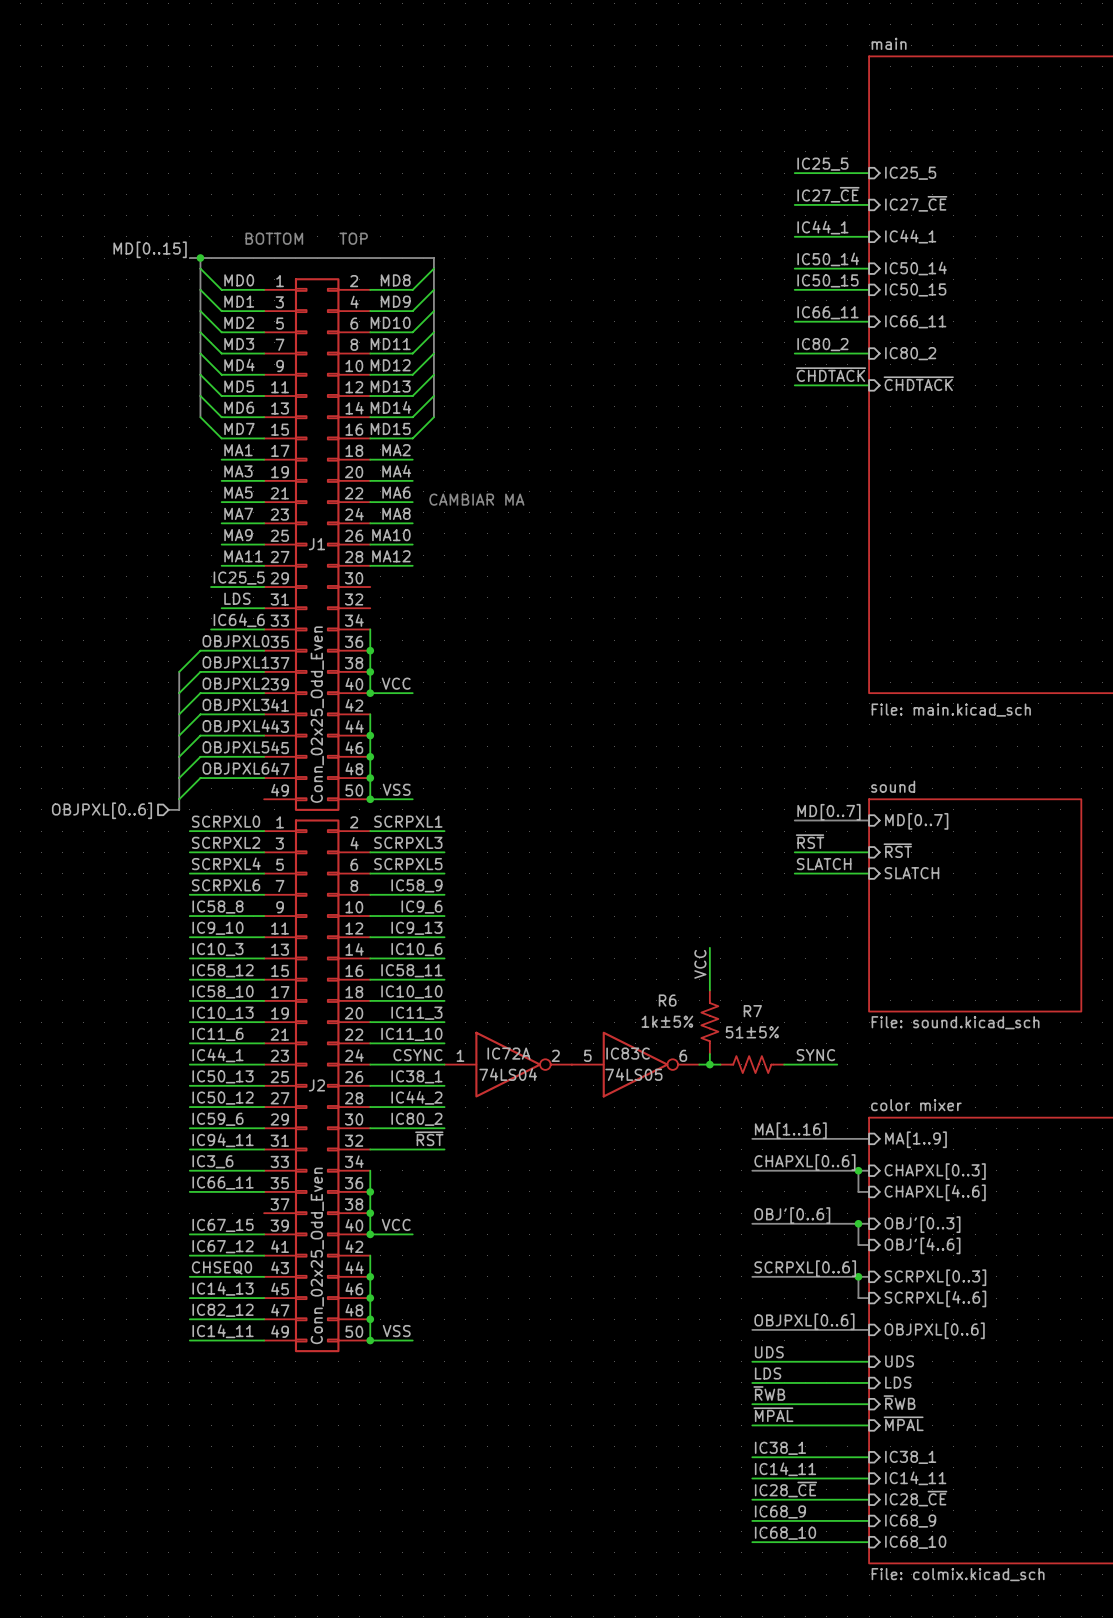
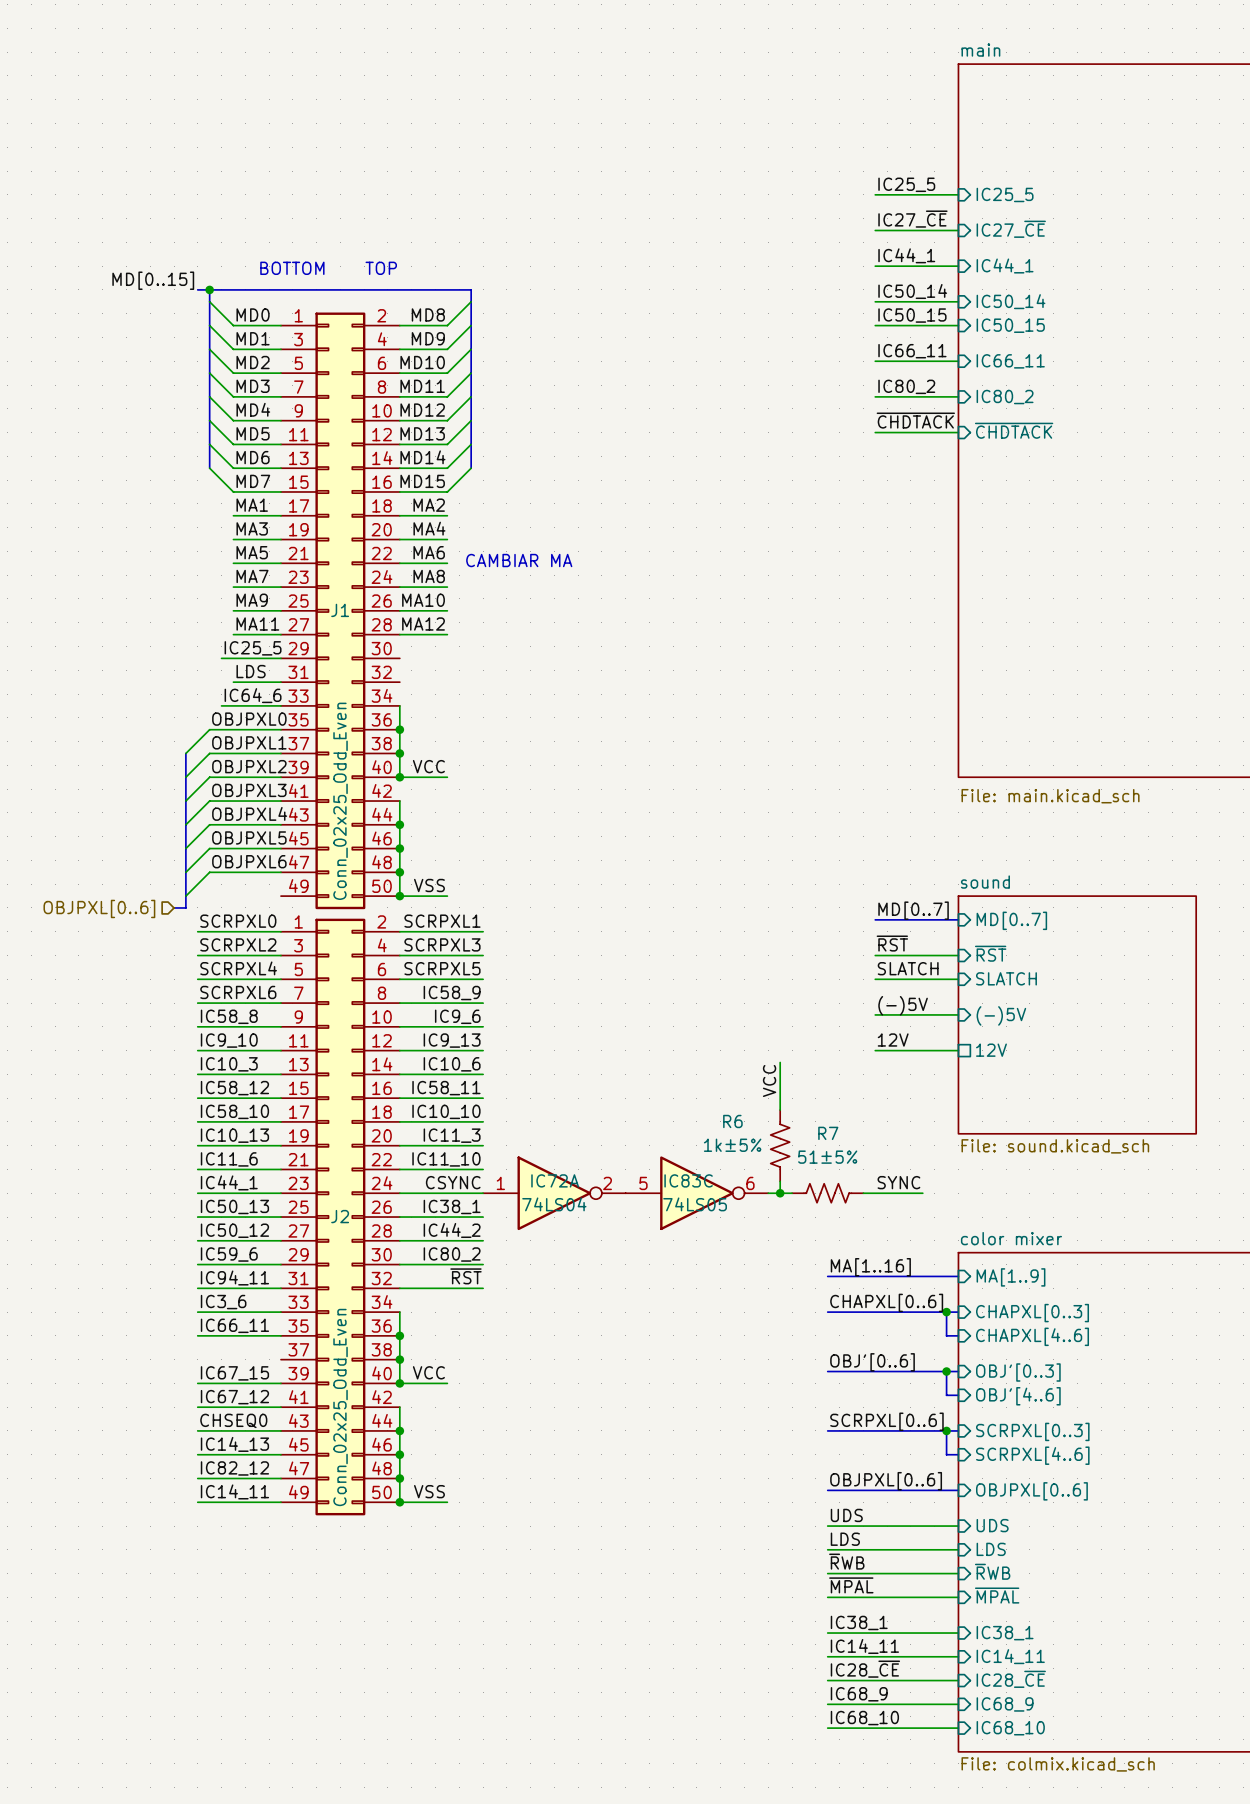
label: none -> (-)5V (903, 1005)
wire: none -> (875, 1014) (958, 1014)
sheet pin: none -> (-)5V (1001, 1015)
label: none -> 12V (893, 1040)
sheet pin: none -> 12V (991, 1050)
wire: none -> (875, 1050) (958, 1050)

